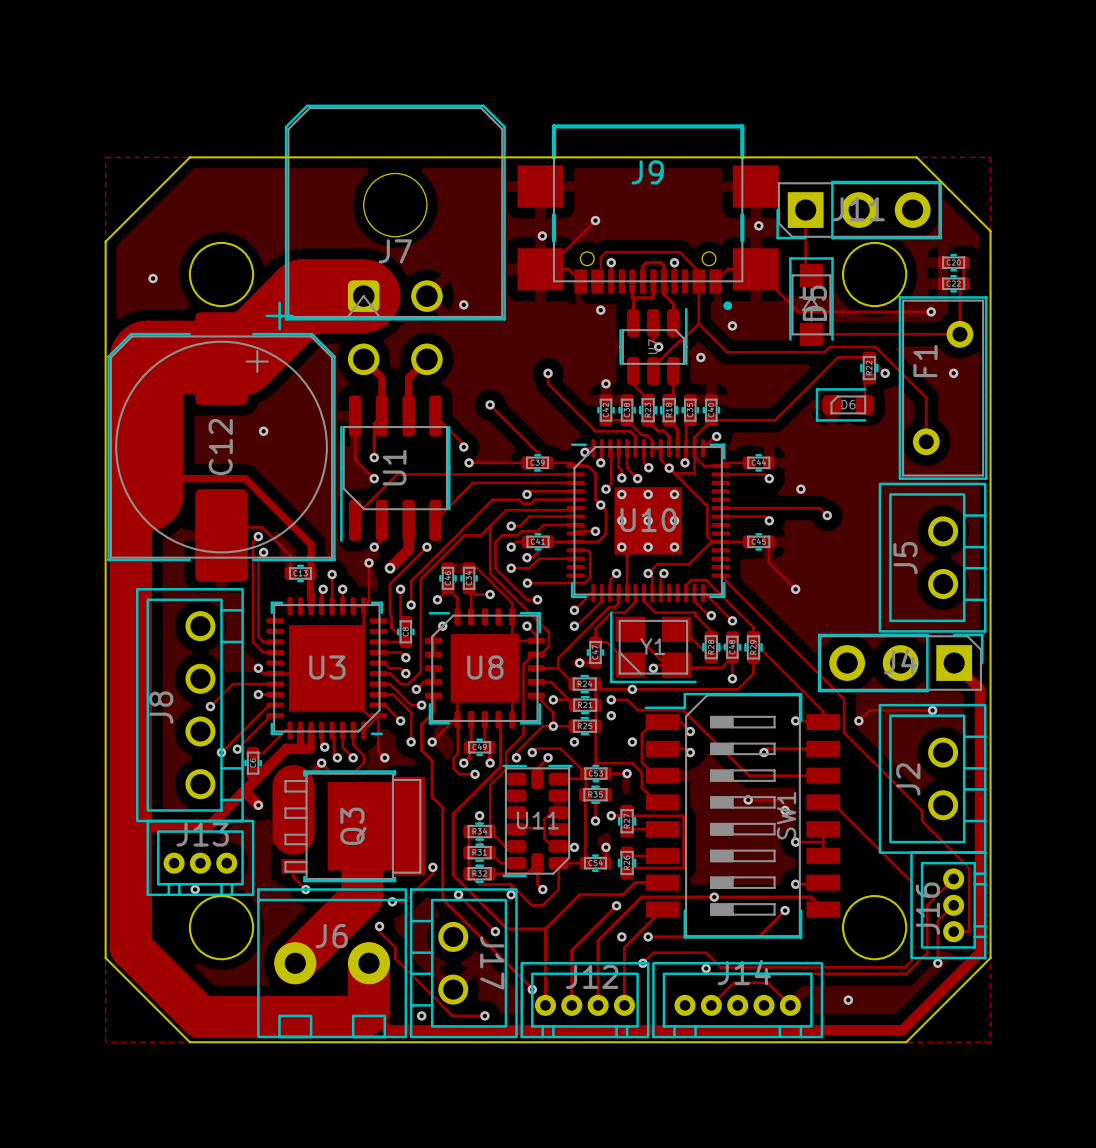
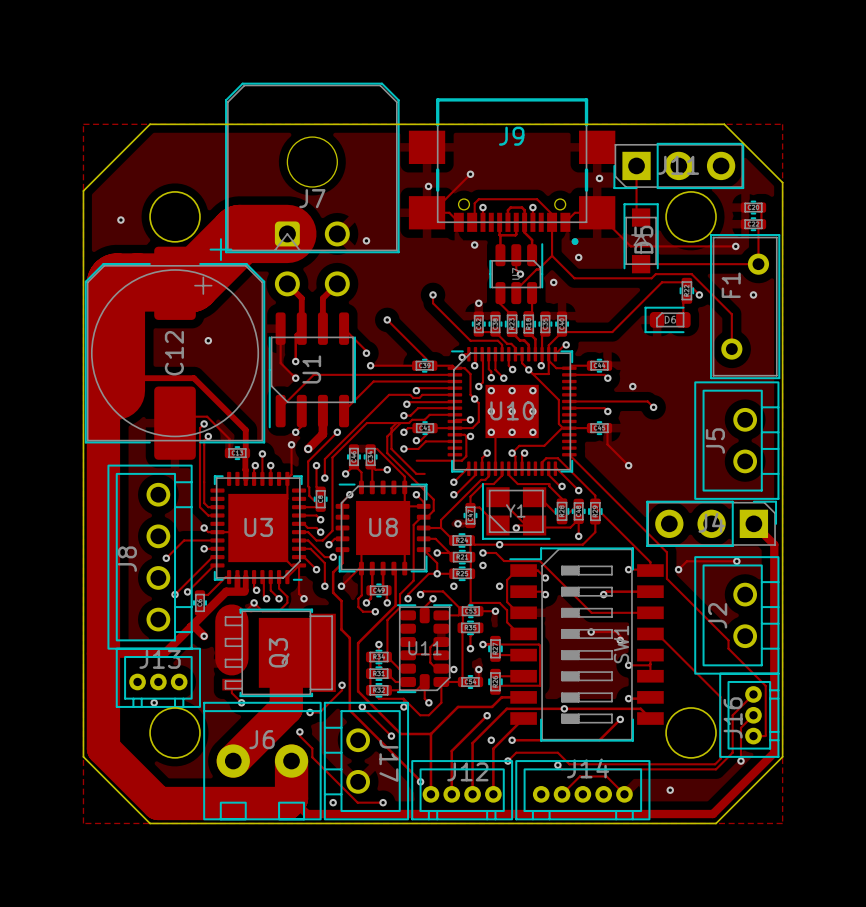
track: (574, 509) (505, 510) (480, 535) -> (454, 402) (408, 402) (406, 404)
via: none -> (406, 404)
track: (490, 526) (490, 552) -> (400, 423) (387, 436)
via: none -> (470, 436)
via: (527, 583) -> none
via: (537, 599) -> none

